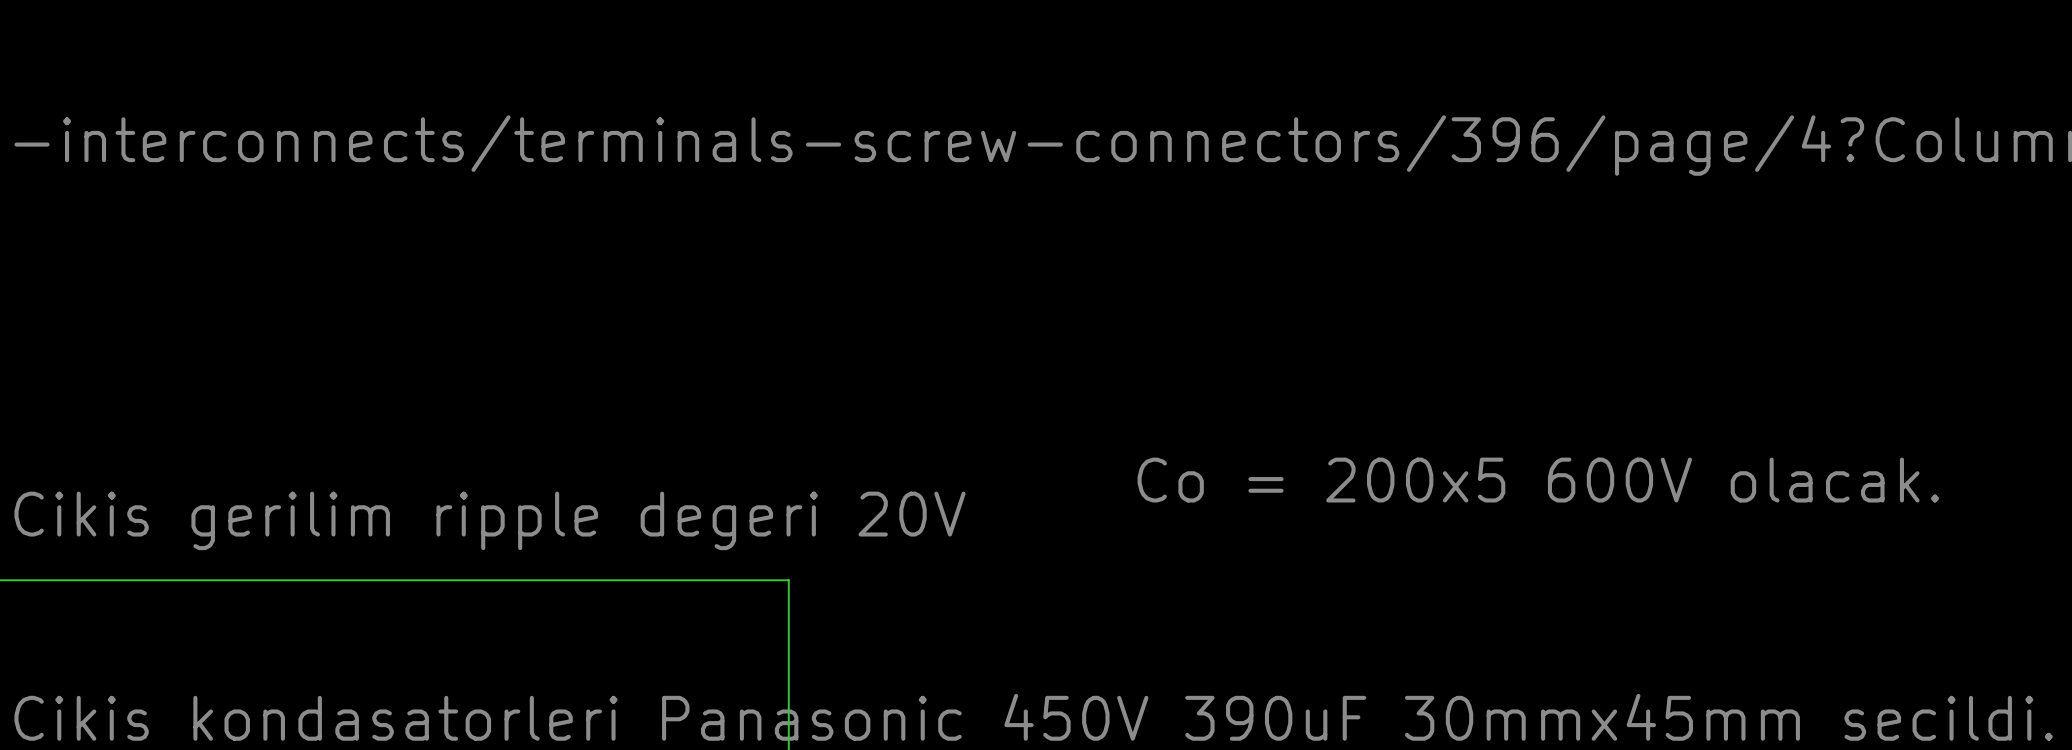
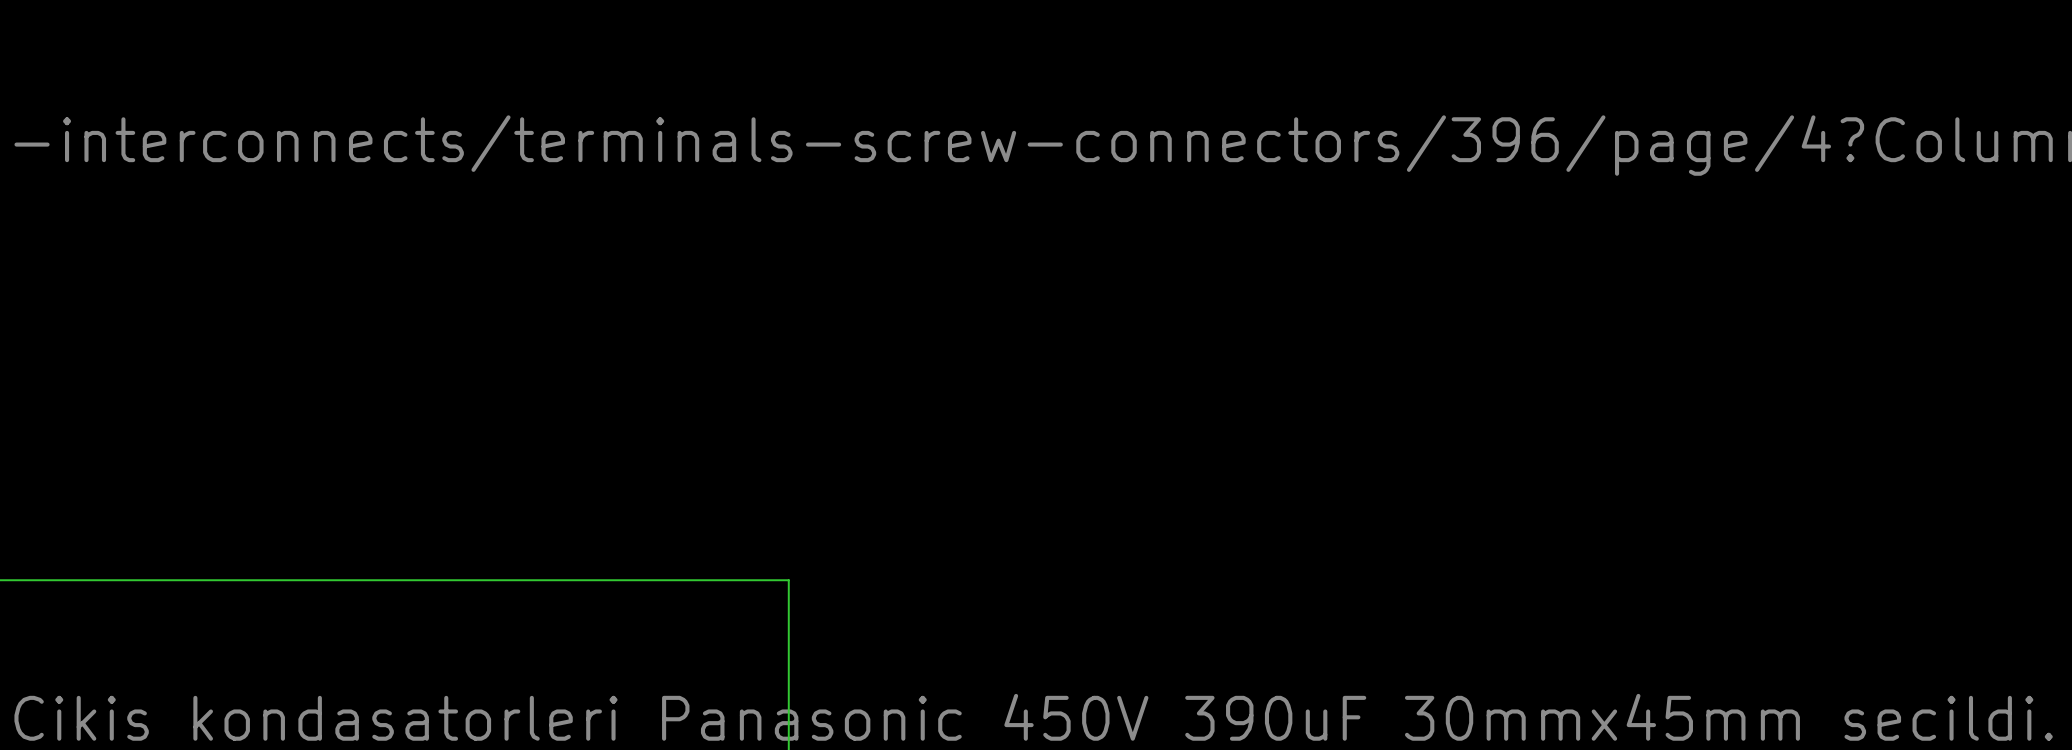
text: Co = 200x5 600V olacak. (1538, 480) -> none
text: Cikis gerilim ripple degeri 20V (490, 520) -> none

